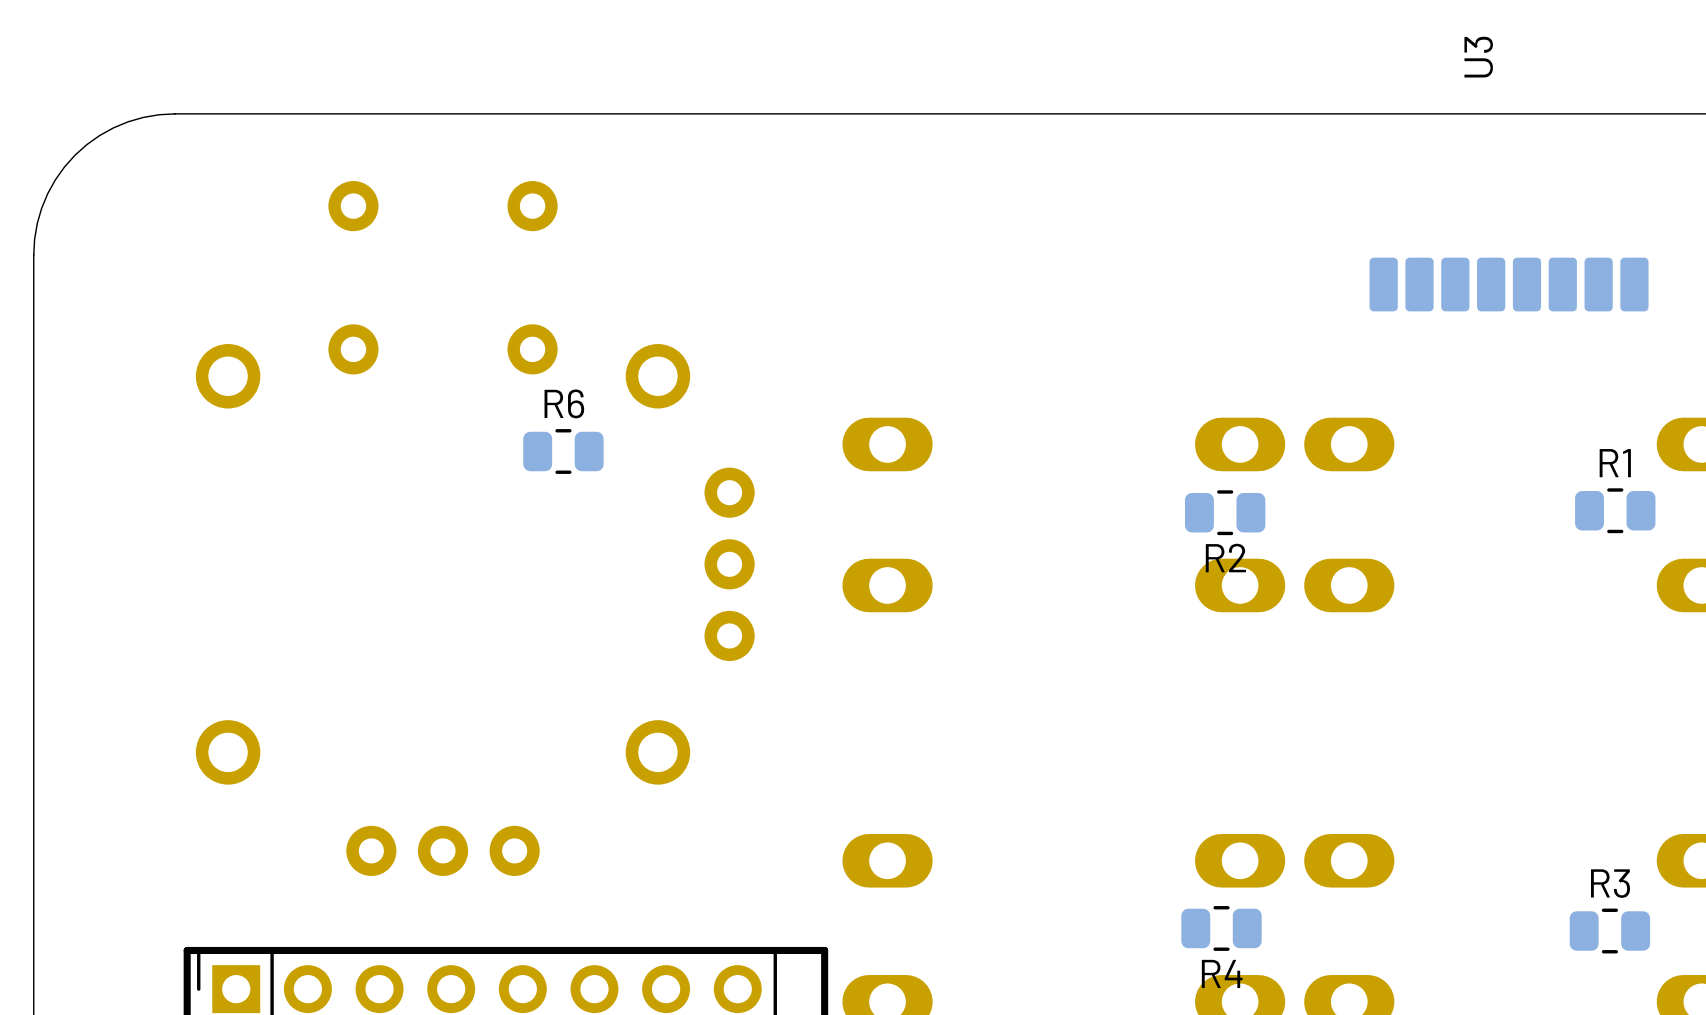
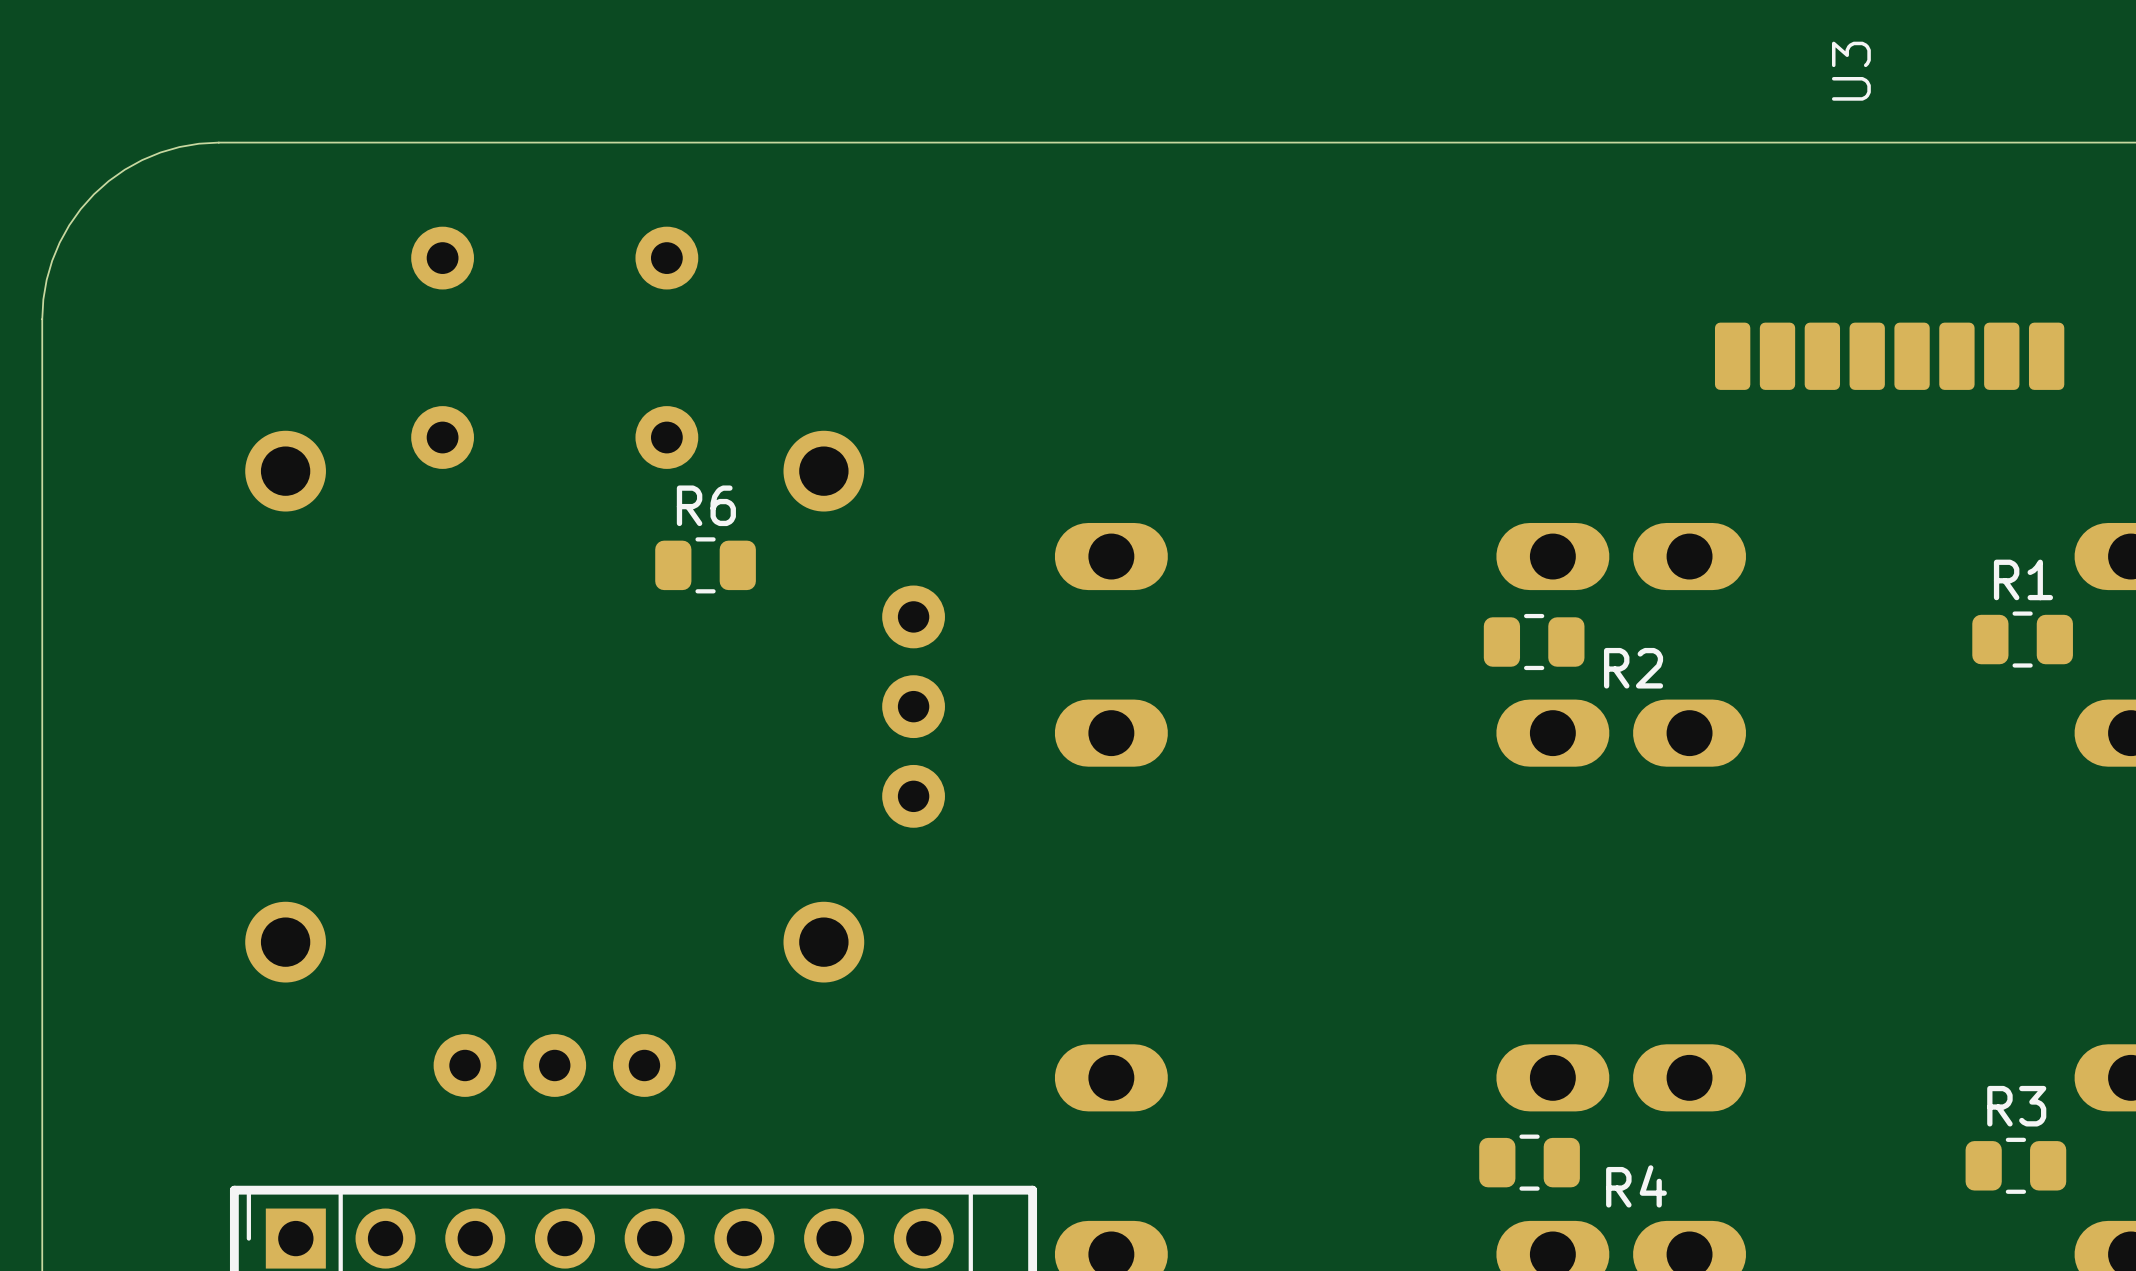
R2 name position: R2 (1225, 558) -> R2 (1633, 668)
R4 name position: R4 (1222, 973) -> R4 (1636, 1186)

